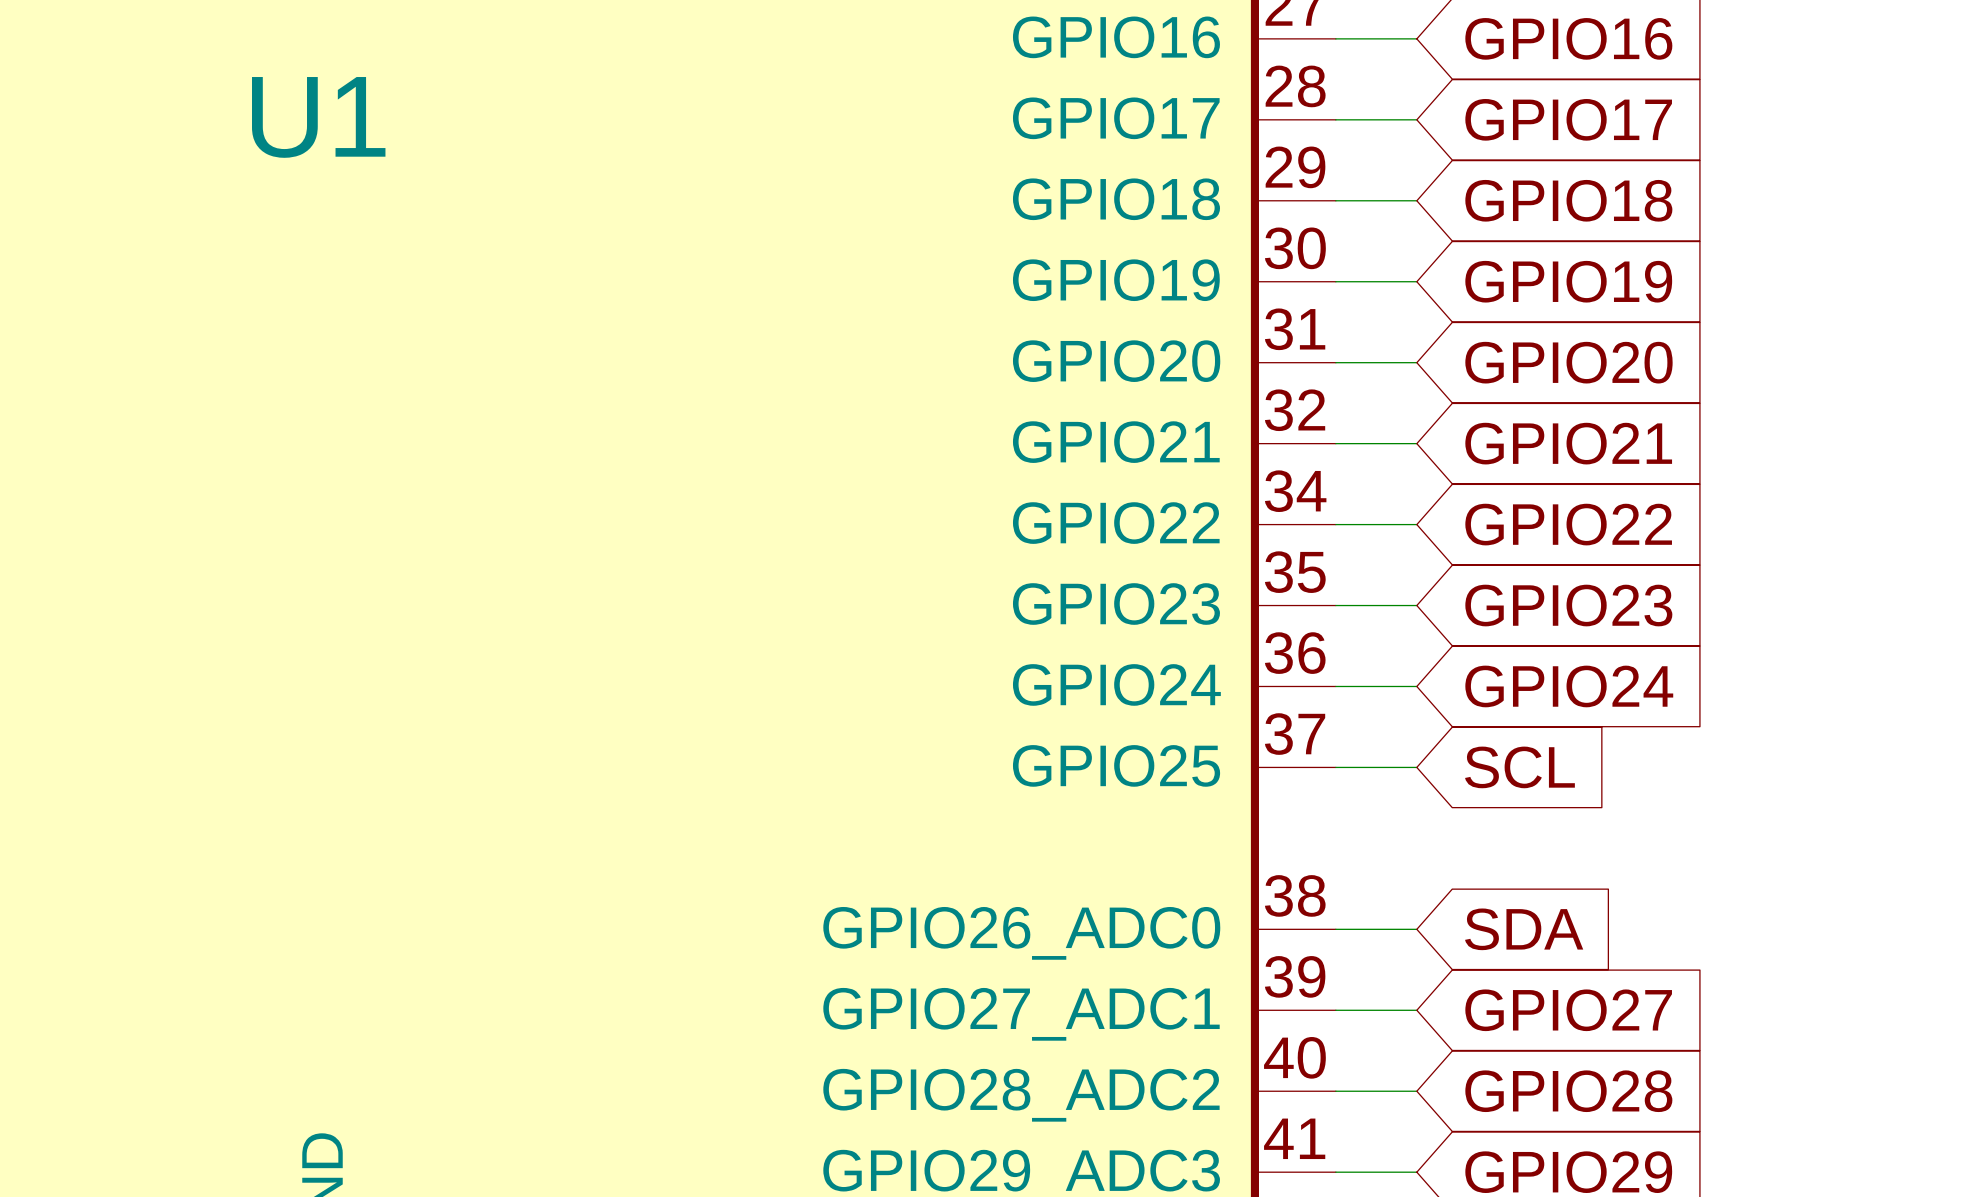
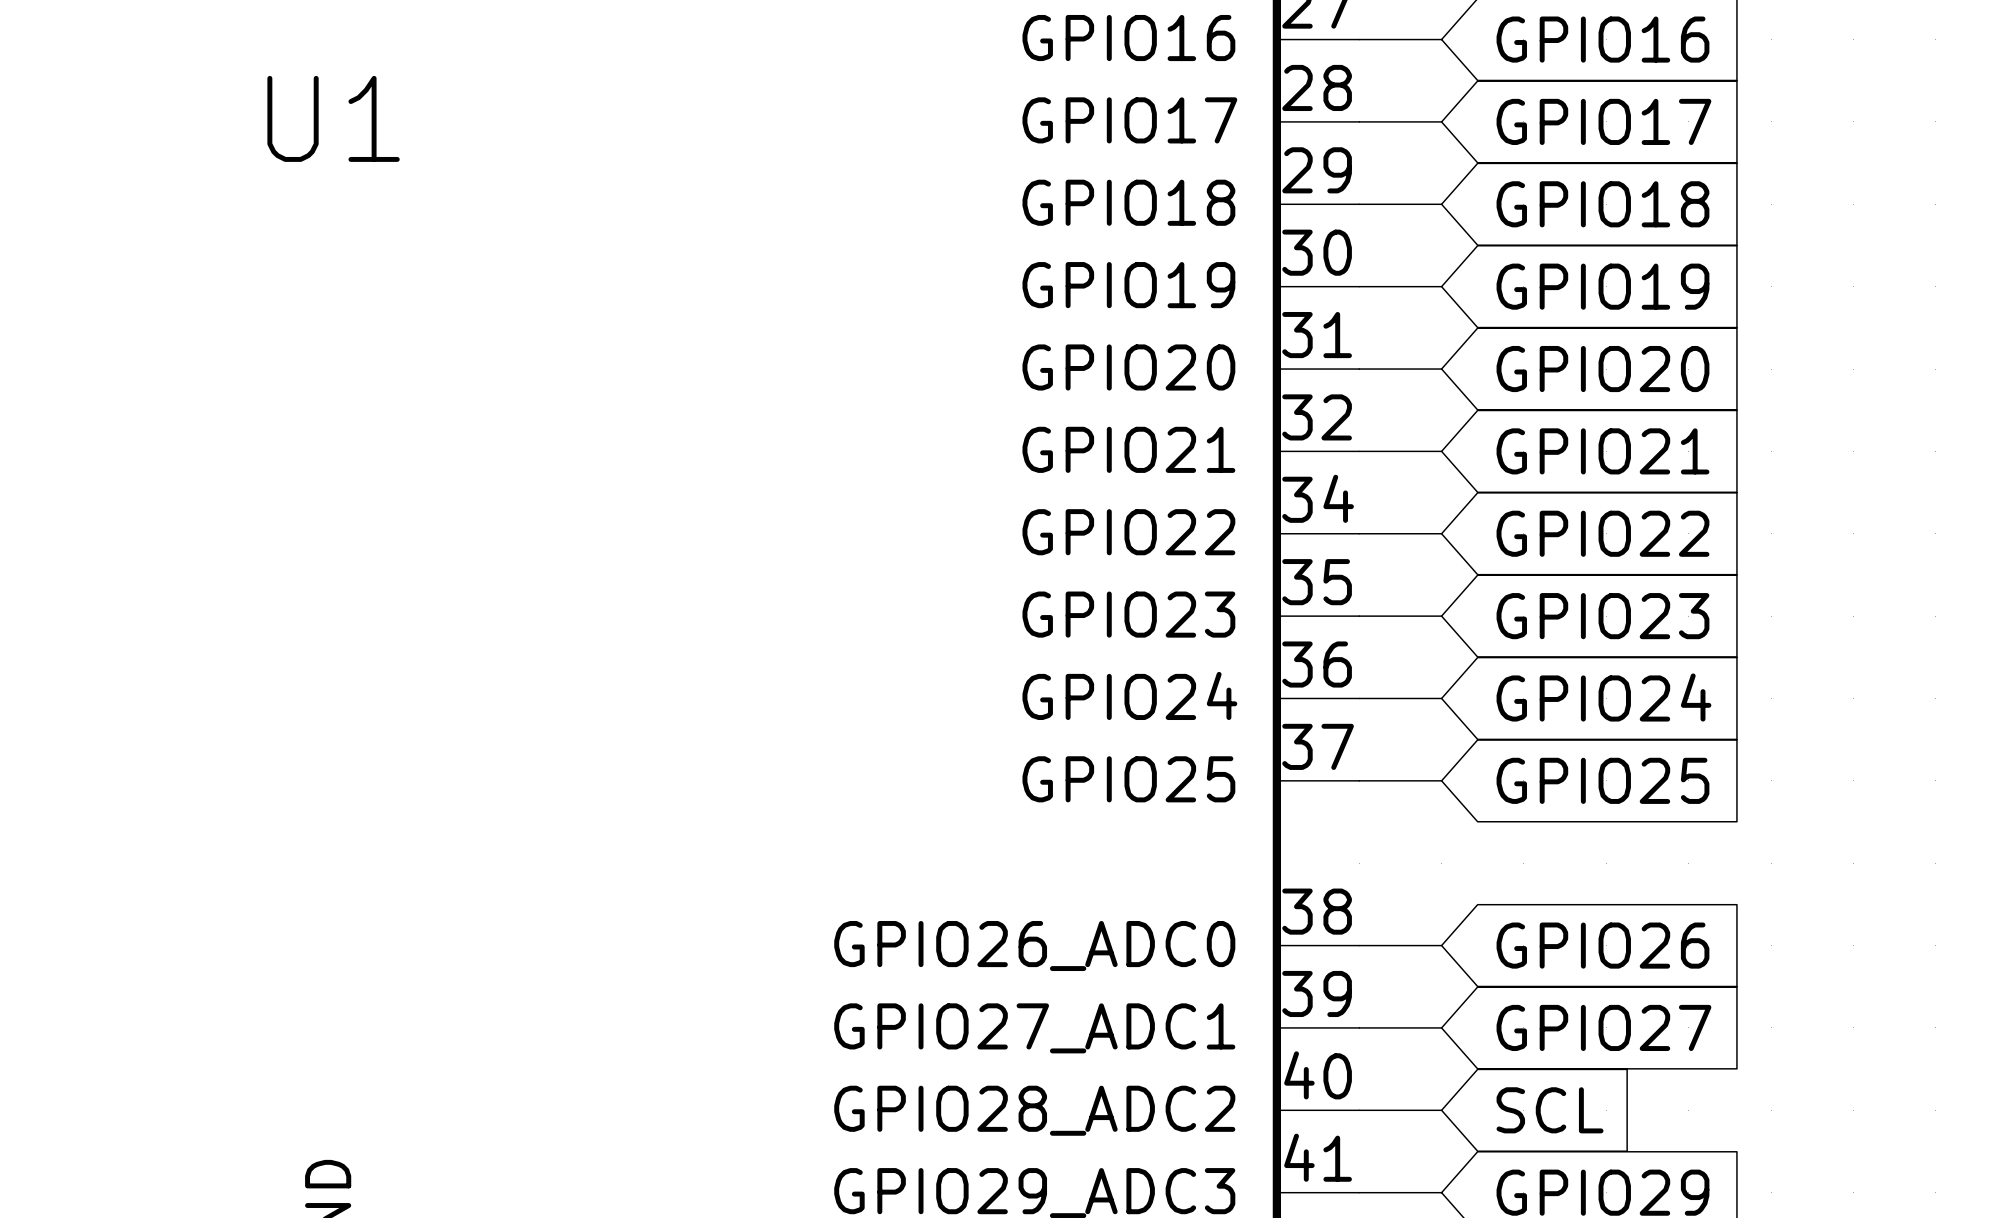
global label: SCL (1519, 767) -> GPIO25 (1602, 780)
global label: SDA (1524, 929) -> GPIO26 (1602, 945)
global label: GPIO28 (1568, 1091) -> SCL (1550, 1110)

